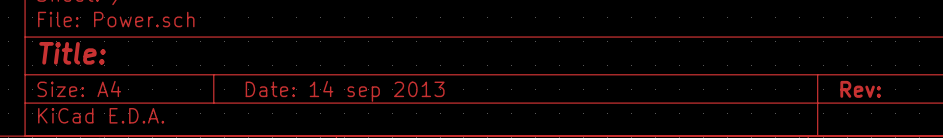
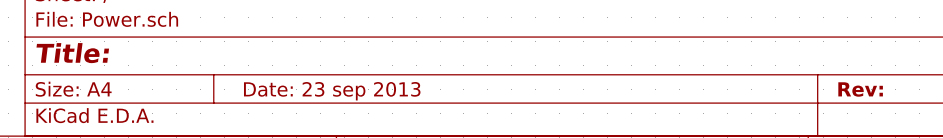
title block: Date: 14 sep 2013 (345, 91) -> Date: 23 sep 2013 (332, 91)

